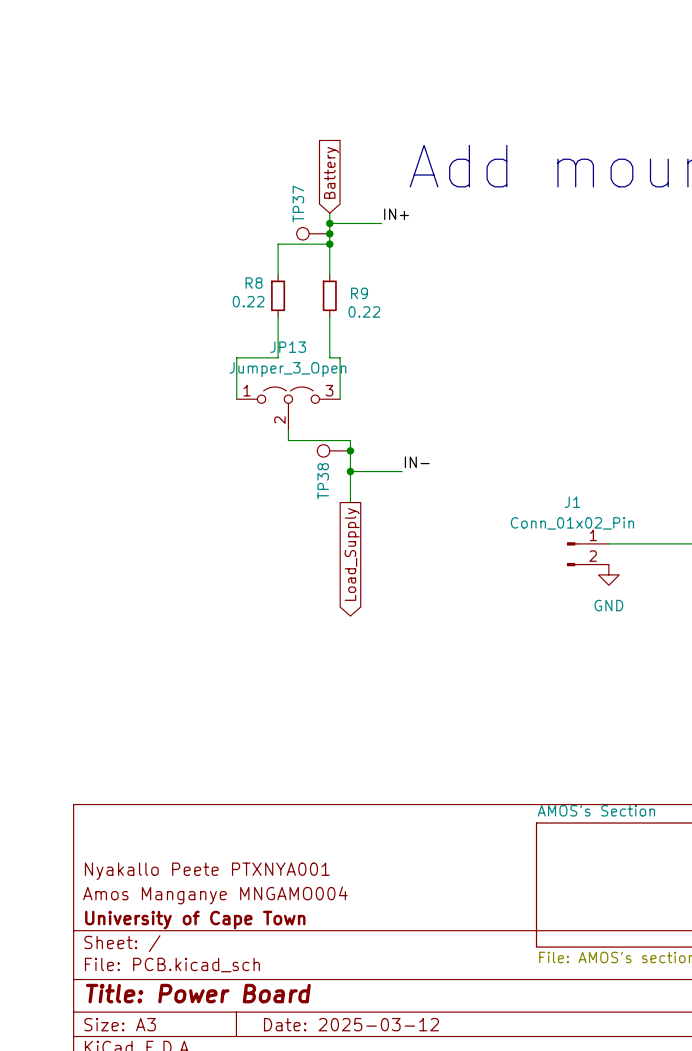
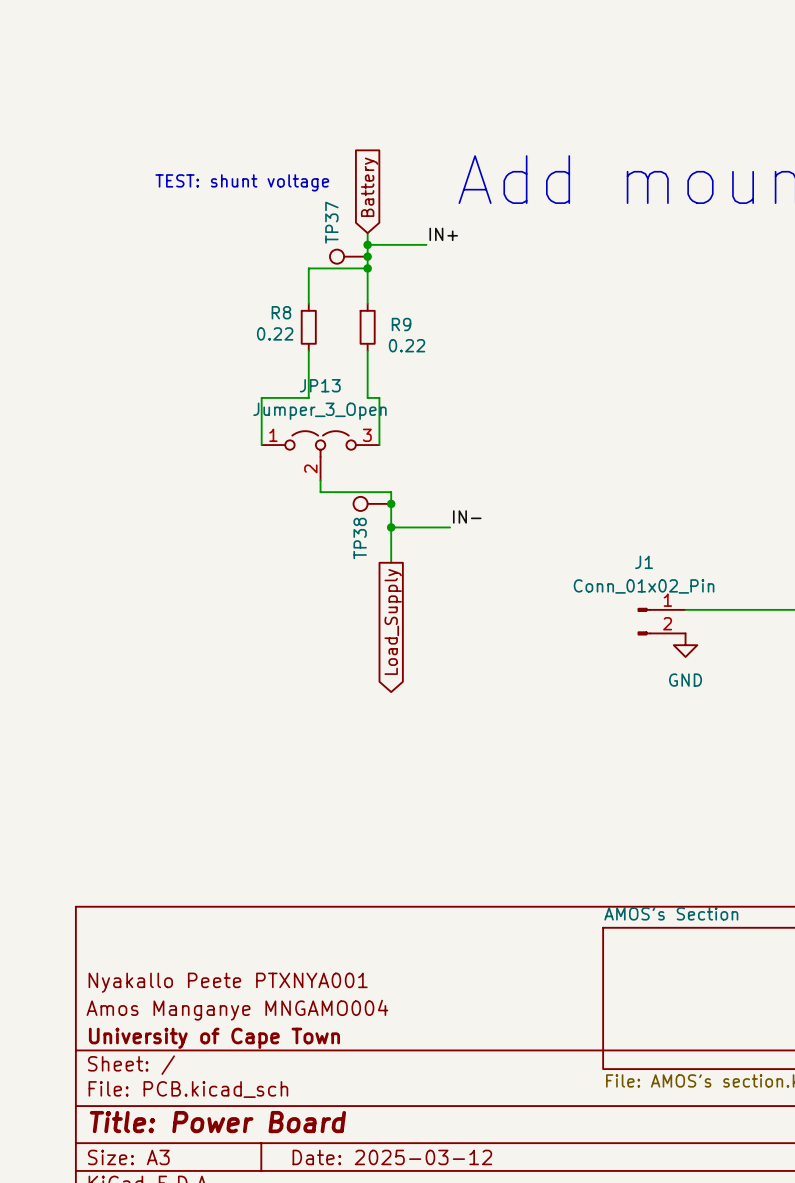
text: none -> TEST: shunt voltage (242, 182)

